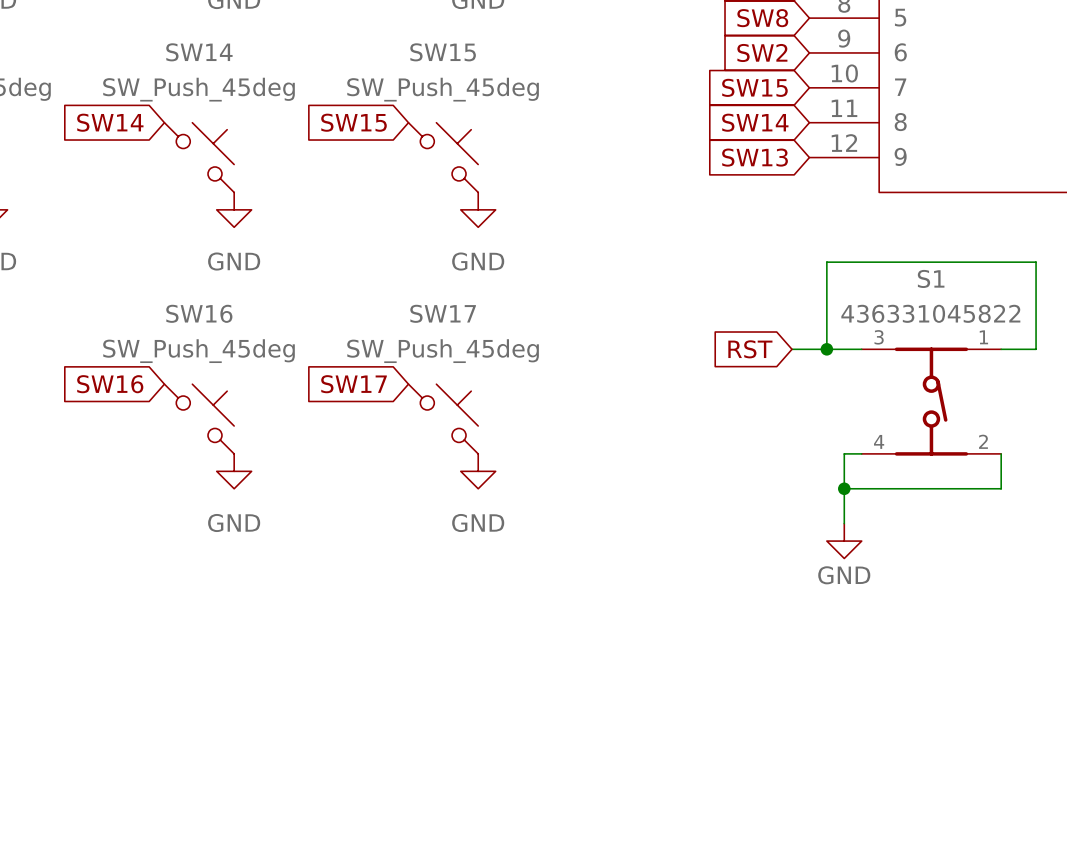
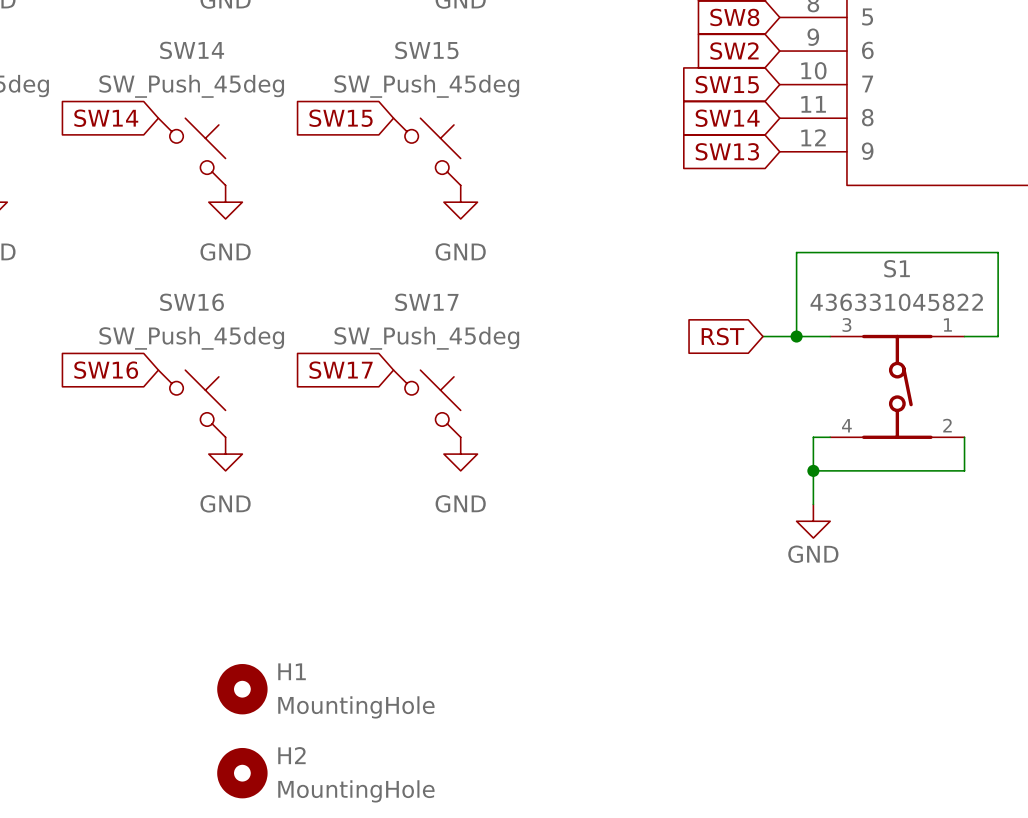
H1: none -> MountingHole (242, 689)
H2: none -> MountingHole (242, 773)

